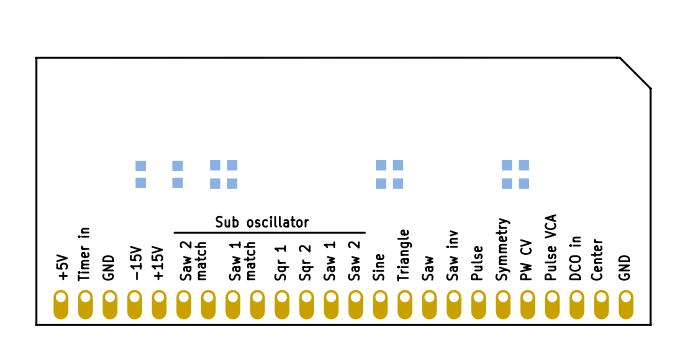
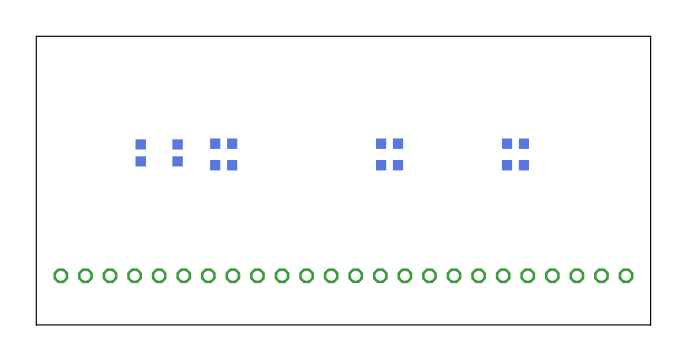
board edge: (36, 57) (619, 57) (650, 88) -> (36, 57) (36, 36) (650, 36) (650, 88)
part: none -> (223, 143)
part: none -> (140, 152)
part: none -> (177, 152)
part: (140, 174) -> none
part: (177, 174) -> none
part: (223, 183) -> none
part position: (389, 183) -> (389, 143)
part position: (515, 183) -> (515, 143)
text: Sub oscillator (262, 221) -> none
line: (364, 232) (174, 232) -> none
text: Pulse VCA (550, 247) -> none
text: Symmetry (502, 249) -> none
text: Timer in (83, 254) -> none
text: Triangle (404, 255) -> none
text: Saw inv (452, 255) -> none
text: DCO in (575, 258) -> none
text: PW CV (525, 259) -> none
text: Center (596, 259) -> none
text: Saw 2 (185, 260) -> none
text: Saw 1 (234, 260) -> none
text: Saw 1 (329, 260) -> none
text: Saw 2 (353, 260) -> none
text: match (200, 261) -> none
text: match (249, 261) -> none
text: Sqr 1 (281, 262) -> none
text: Sqr 2 (306, 262) -> none
text: -15V (135, 263) -> none
text: +15V (157, 263) -> none
text: Pulse (476, 263) -> none
text: +5V (62, 267) -> none
text: GND (108, 267) -> none
text: Sine (378, 267) -> none
text: GND (624, 267) -> none
text: Saw (427, 268) -> none
part: none -> (60, 275)
part: none -> (85, 275)
part: none -> (110, 275)
part: none -> (134, 275)
part: none -> (159, 275)
part: none -> (183, 275)
part: none -> (208, 275)
part: none -> (232, 275)
part: none -> (257, 275)
part: none -> (282, 275)
part: none -> (306, 275)
part: none -> (331, 275)
part: none -> (355, 275)
part: none -> (380, 275)
part: none -> (404, 275)
part: none -> (429, 275)
part: none -> (454, 275)
part: none -> (478, 275)
part: none -> (503, 275)
part: none -> (527, 275)
part: none -> (552, 275)
part: none -> (576, 275)
part: none -> (601, 275)
part: none -> (626, 275)
part: (60, 304) -> none
part: (85, 304) -> none
part: (110, 304) -> none
part: (134, 304) -> none
part: (159, 304) -> none
part: (183, 304) -> none
part: (208, 304) -> none
part: (232, 304) -> none
part: (257, 304) -> none
part: (282, 304) -> none
part: (306, 304) -> none
part: (331, 304) -> none
part: (355, 304) -> none
part: (380, 304) -> none
part: (404, 304) -> none
part: (429, 304) -> none
part: (454, 304) -> none
part: (478, 304) -> none
part: (503, 304) -> none
part: (527, 304) -> none
part: (552, 304) -> none
part: (576, 304) -> none
part: (601, 304) -> none
part: (626, 304) -> none

